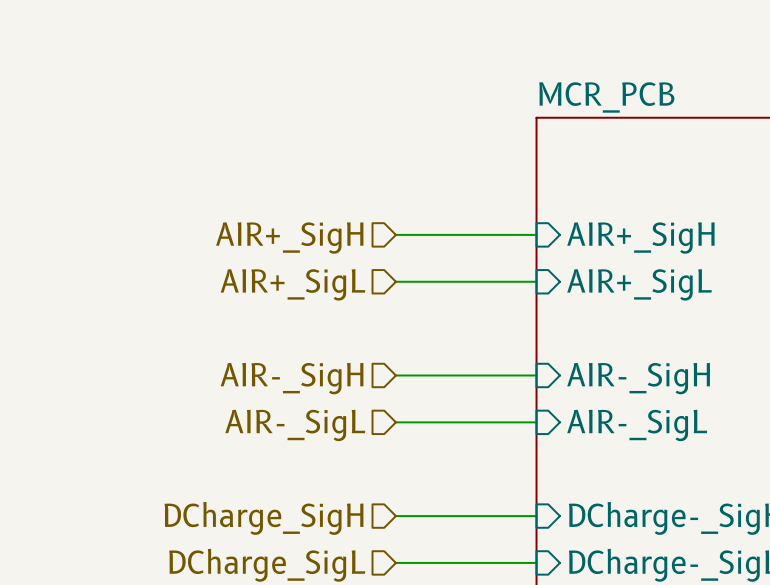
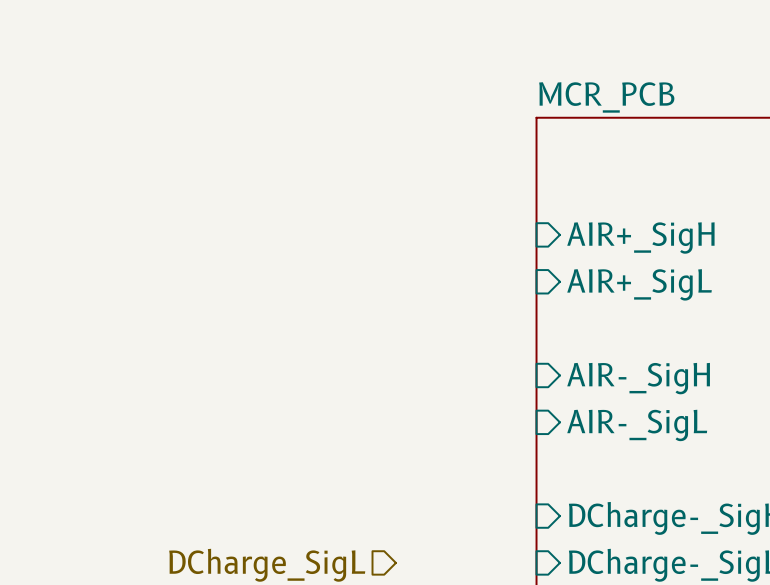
wire: (395, 234) (536, 234) -> none
hierarchical label: AIR+_SigH (289, 238) -> none
wire: (395, 281) (536, 281) -> none
hierarchical label: AIR+_SigL (292, 284) -> none
wire: (395, 375) (536, 375) -> none
hierarchical label: AIR-_SigH (292, 378) -> none
wire: (395, 422) (536, 422) -> none
hierarchical label: AIR-_SigL (295, 425) -> none
wire: (395, 516) (536, 516) -> none
hierarchical label: DCharge_SigH (263, 518) -> none
wire: (395, 562) (536, 562) -> none

